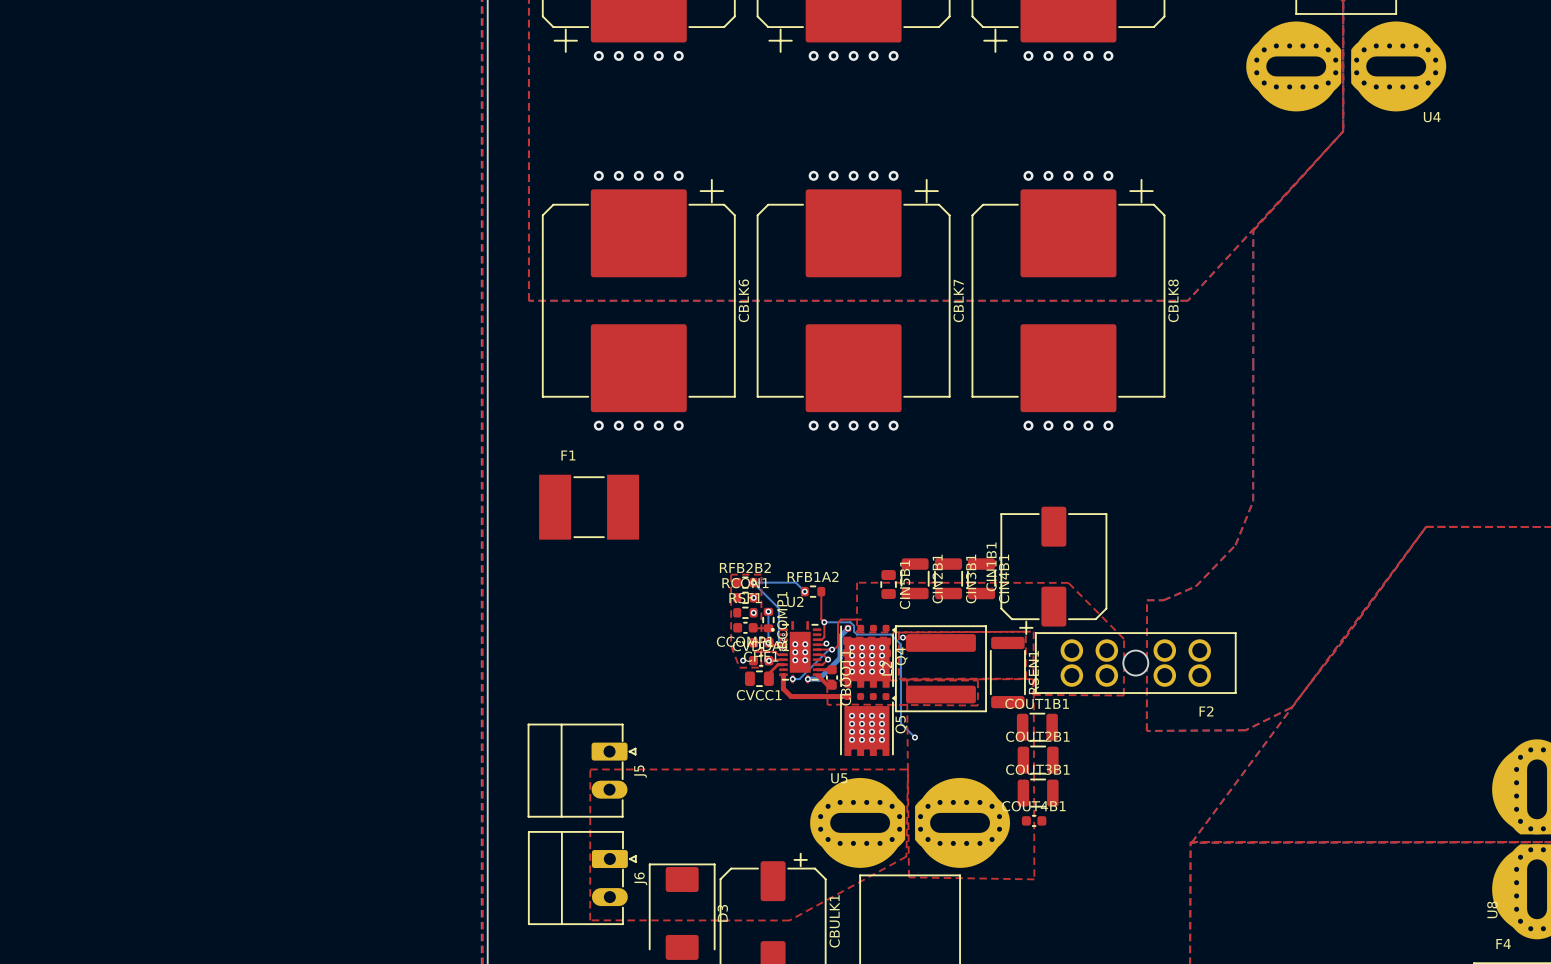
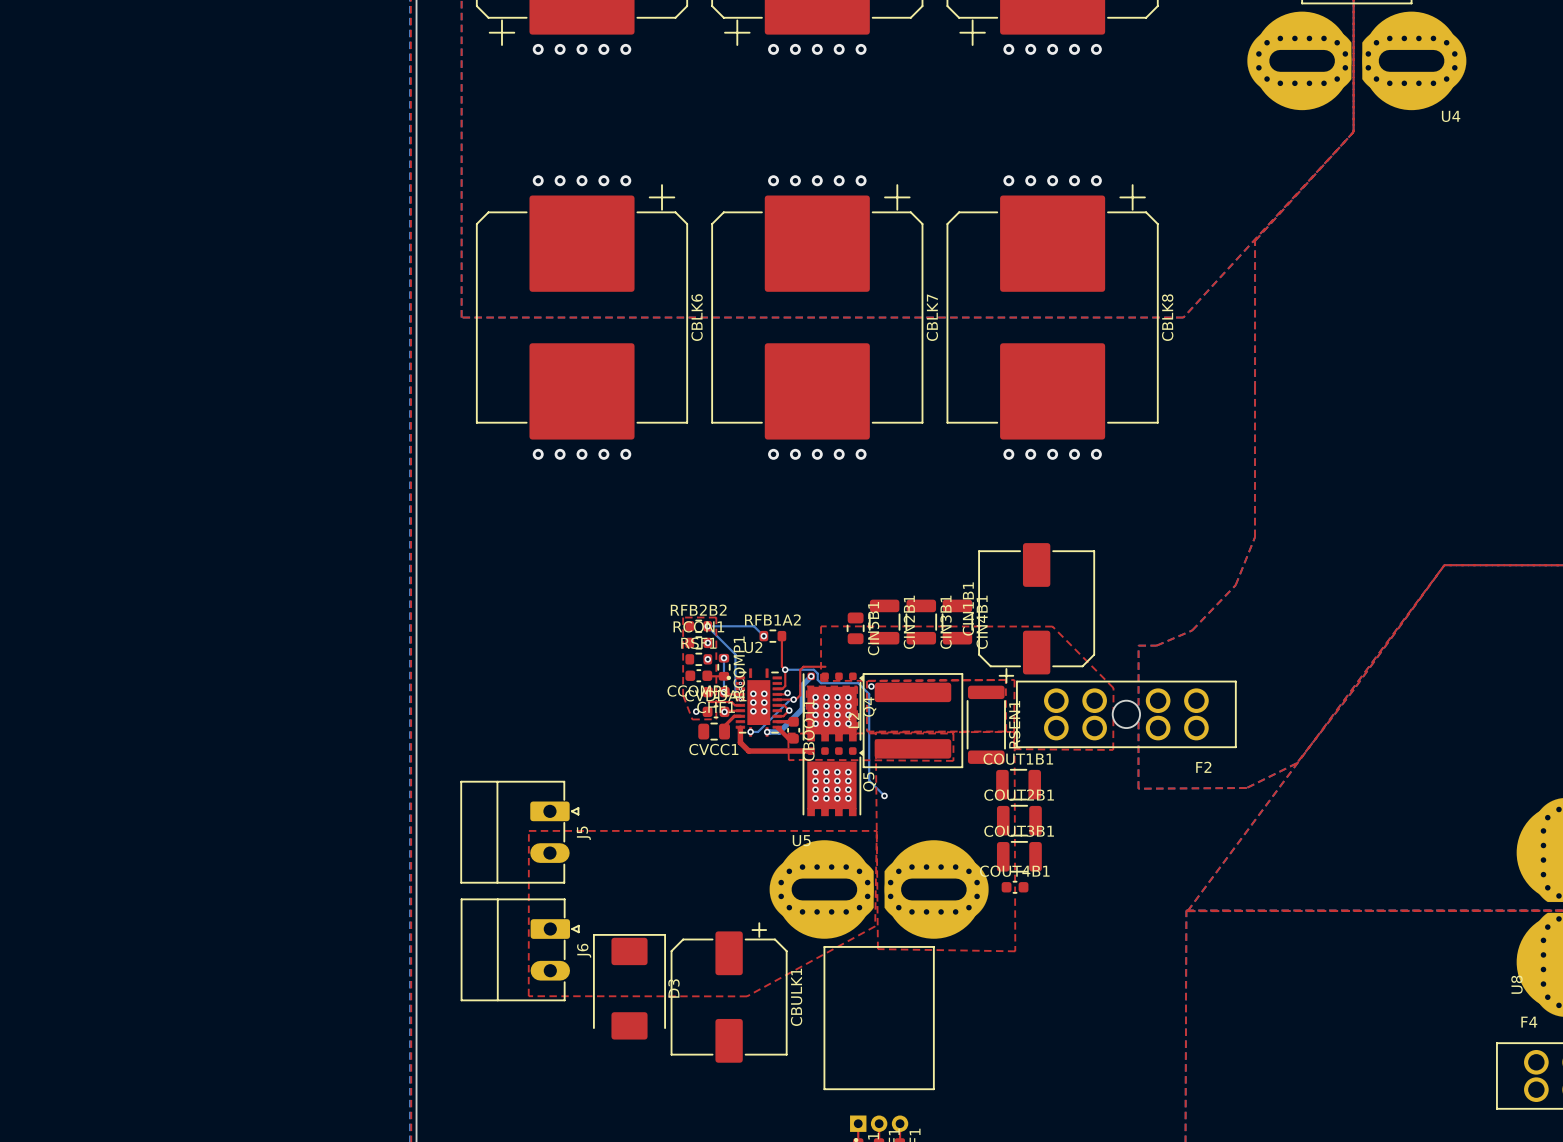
F1: (589, 507) -> none

